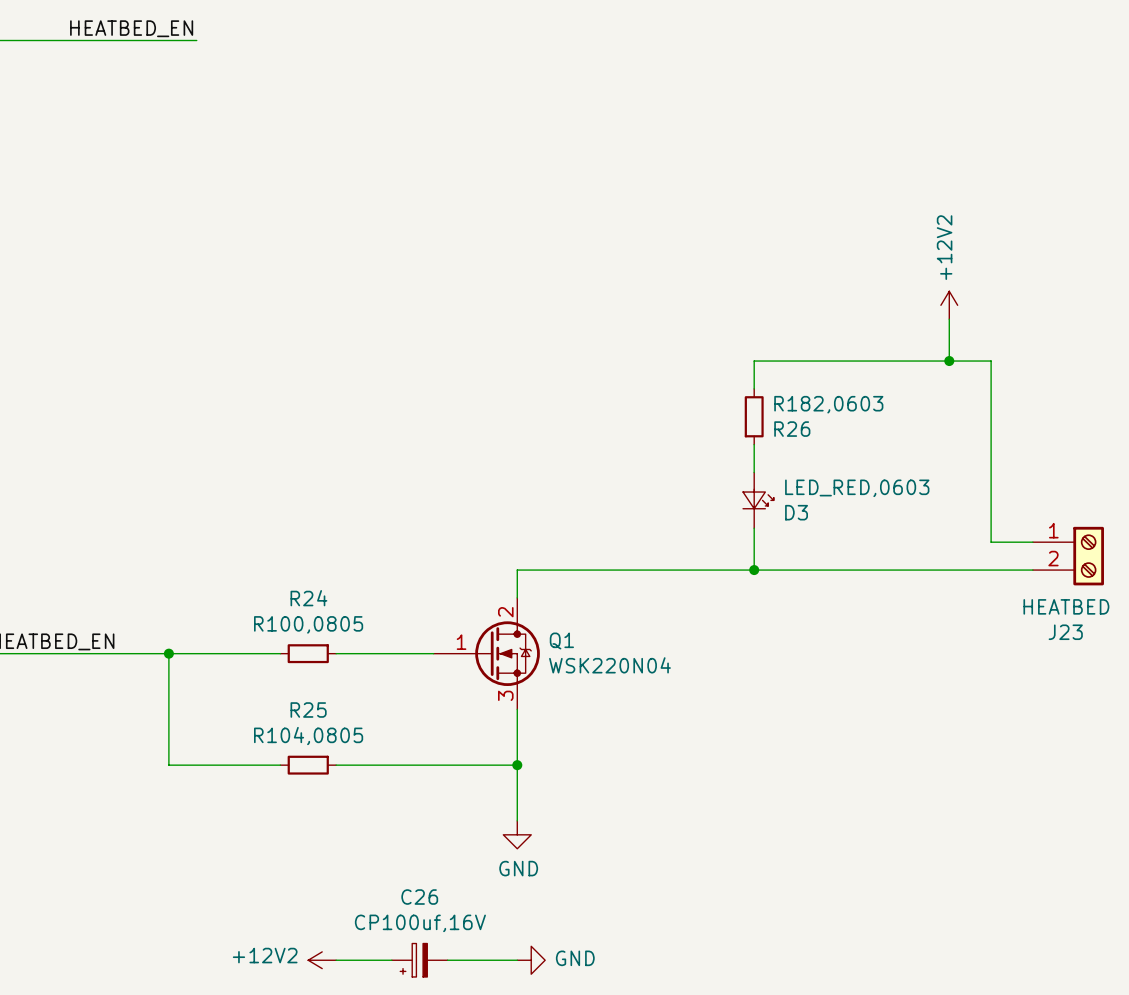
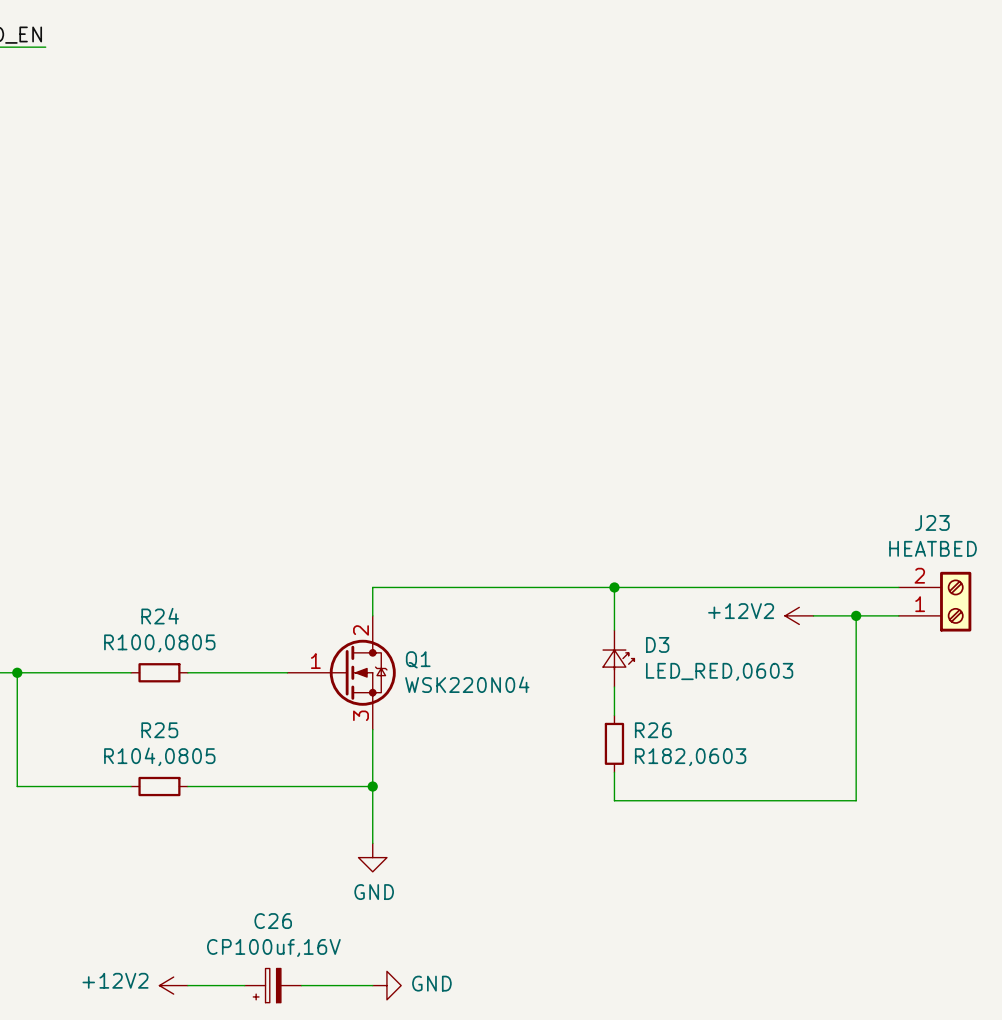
power symbol: +12V2 (949, 305) -> none
wire: (949, 319) (949, 361) -> none
junction: (949, 361) -> none
wire: (754, 388) (754, 361) (991, 361) (991, 542) (1032, 542) -> none
R26 value position: R182,0603 (828, 404) -> R182,0603 (690, 757)
R26 position: (754, 416) -> (614, 743)
R26 name position: R26 (792, 429) -> R26 (653, 730)
wire: (754, 444) (754, 472) -> (614, 686) (614, 715)
D3 flip: as is (758, 498) -> up-down (618, 659)
D3 position: (758, 500) -> (618, 658)
wire: (754, 528) (754, 570) -> (614, 630) (614, 587)
J23 flip: as is (1088, 556) -> up-down (955, 601)
power symbol: none -> +12V2 (799, 615)
wire: none -> (813, 615) (898, 615)
wire: none -> (856, 615) (856, 800) (614, 800) (614, 772)
junction: none -> (856, 615)

